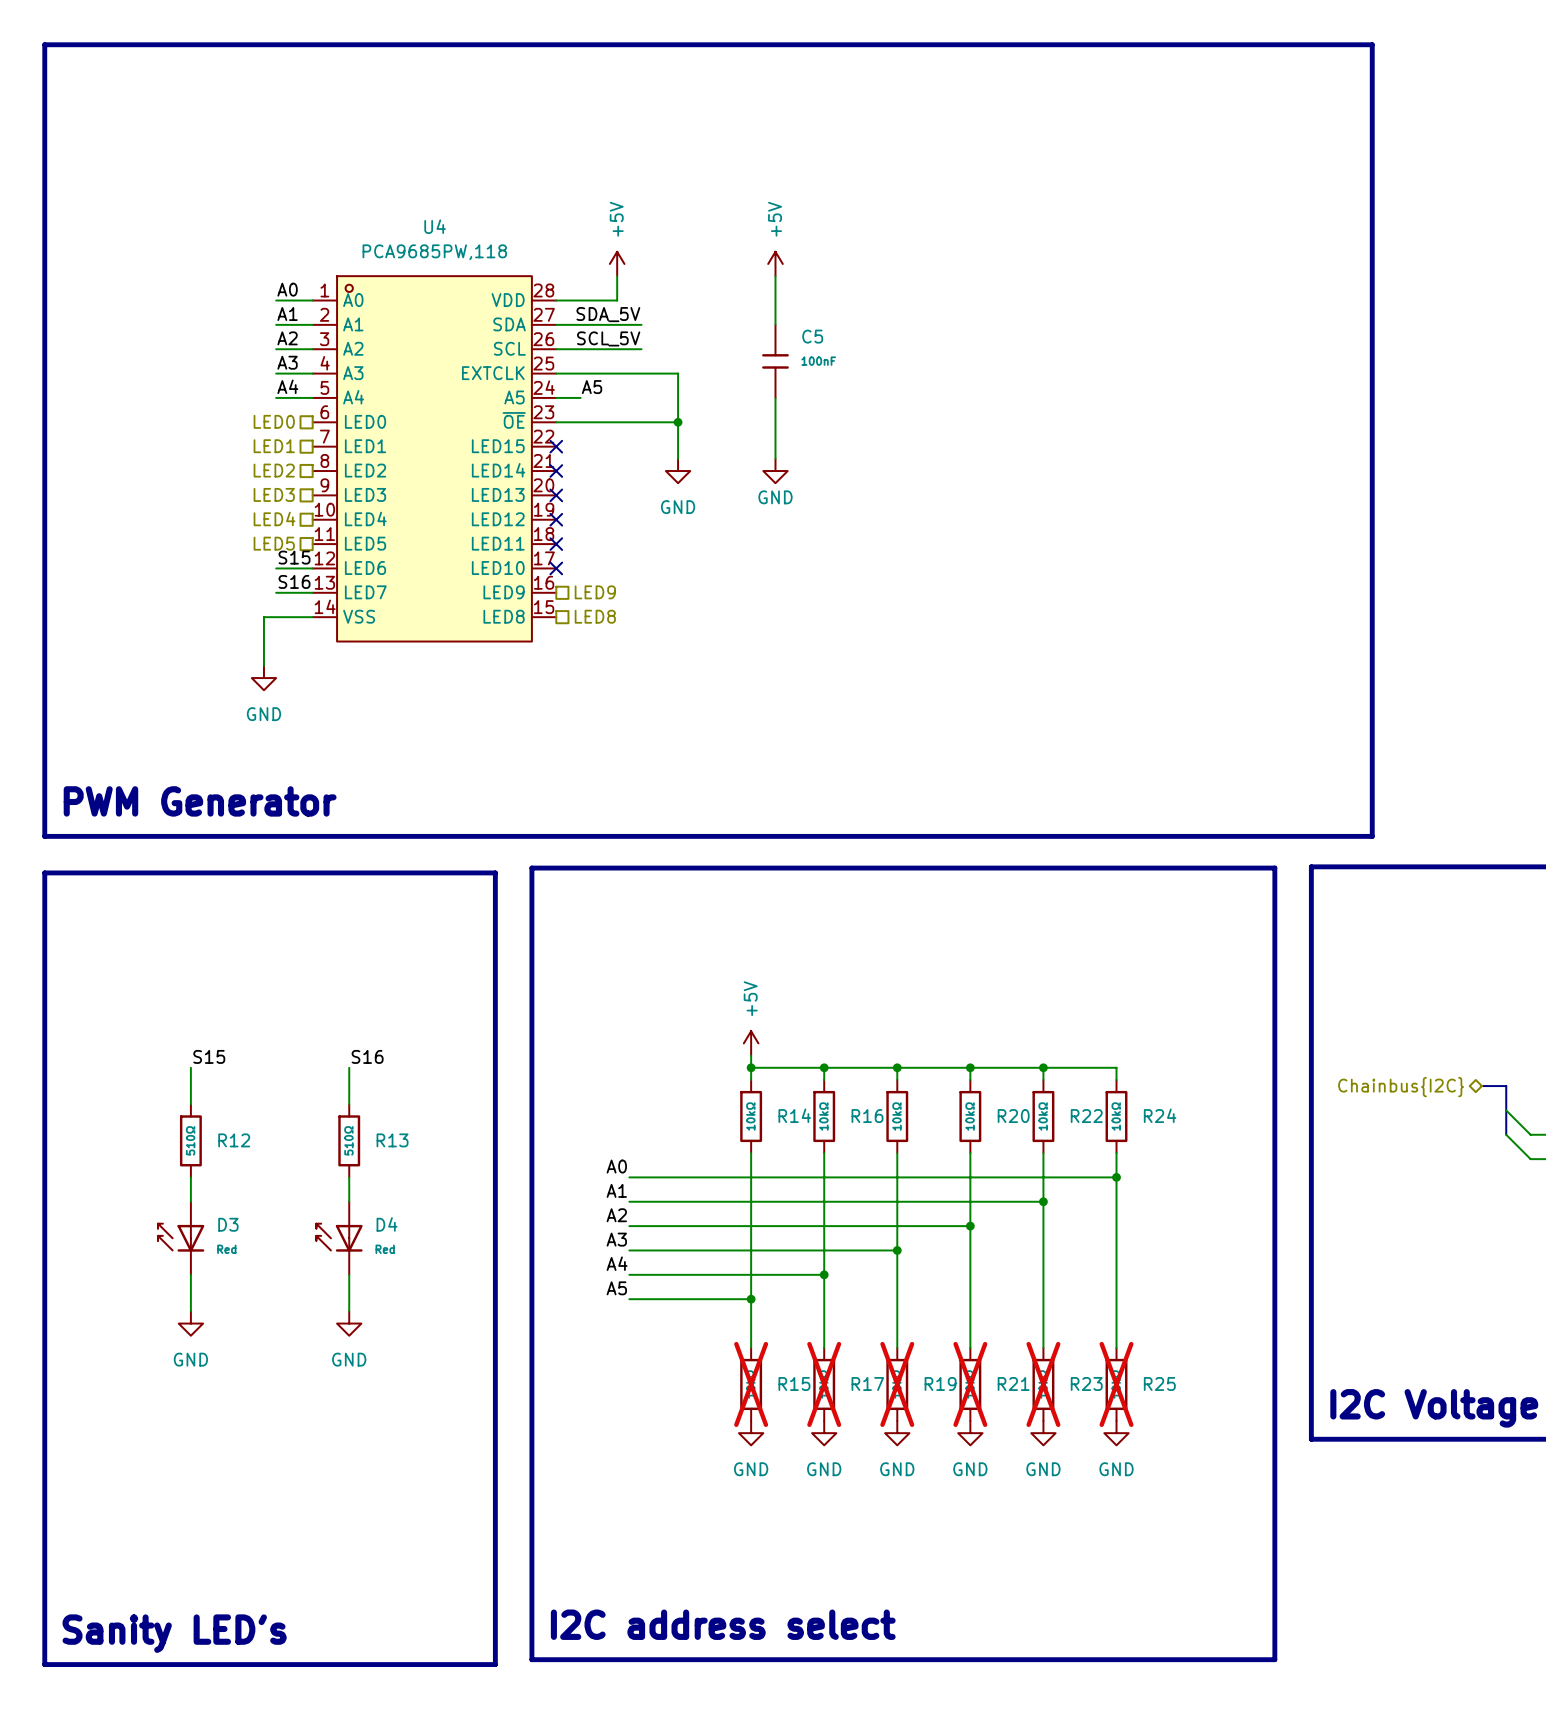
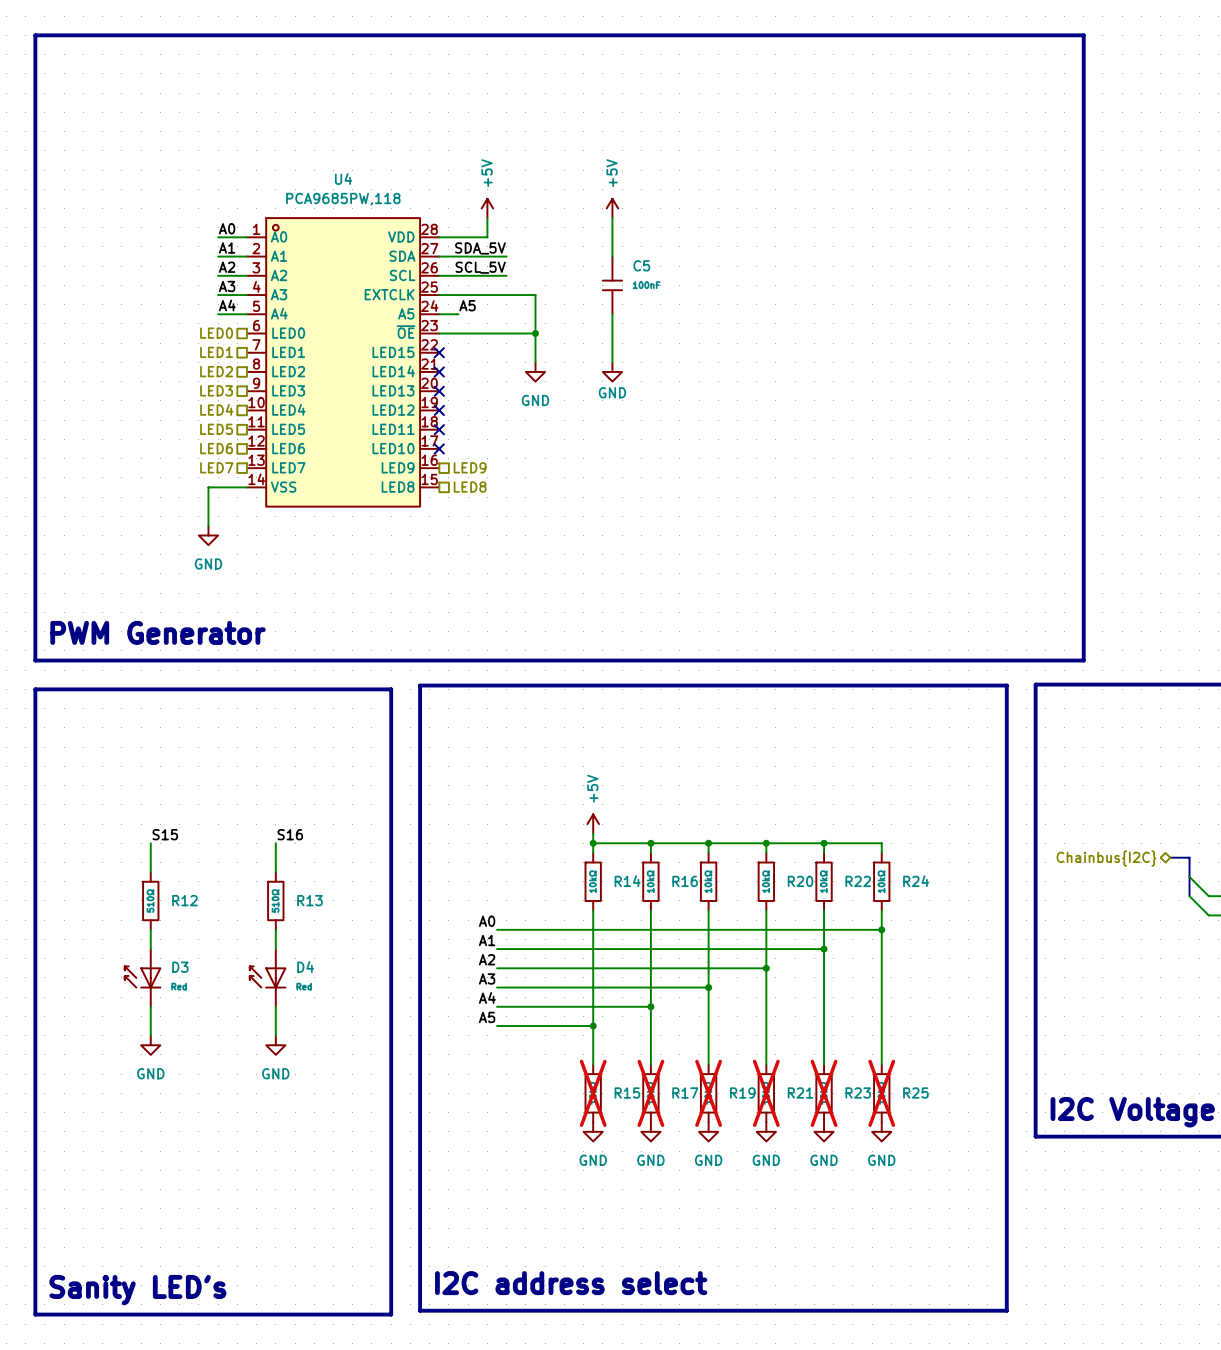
label: S15 (294, 557) -> none
hierarchical label: none -> LED6 (216, 448)
wire: (276, 568) (312, 568) -> none
label: S16 (294, 581) -> none
hierarchical label: none -> LED7 (216, 467)
wire: (276, 592) (312, 592) -> none

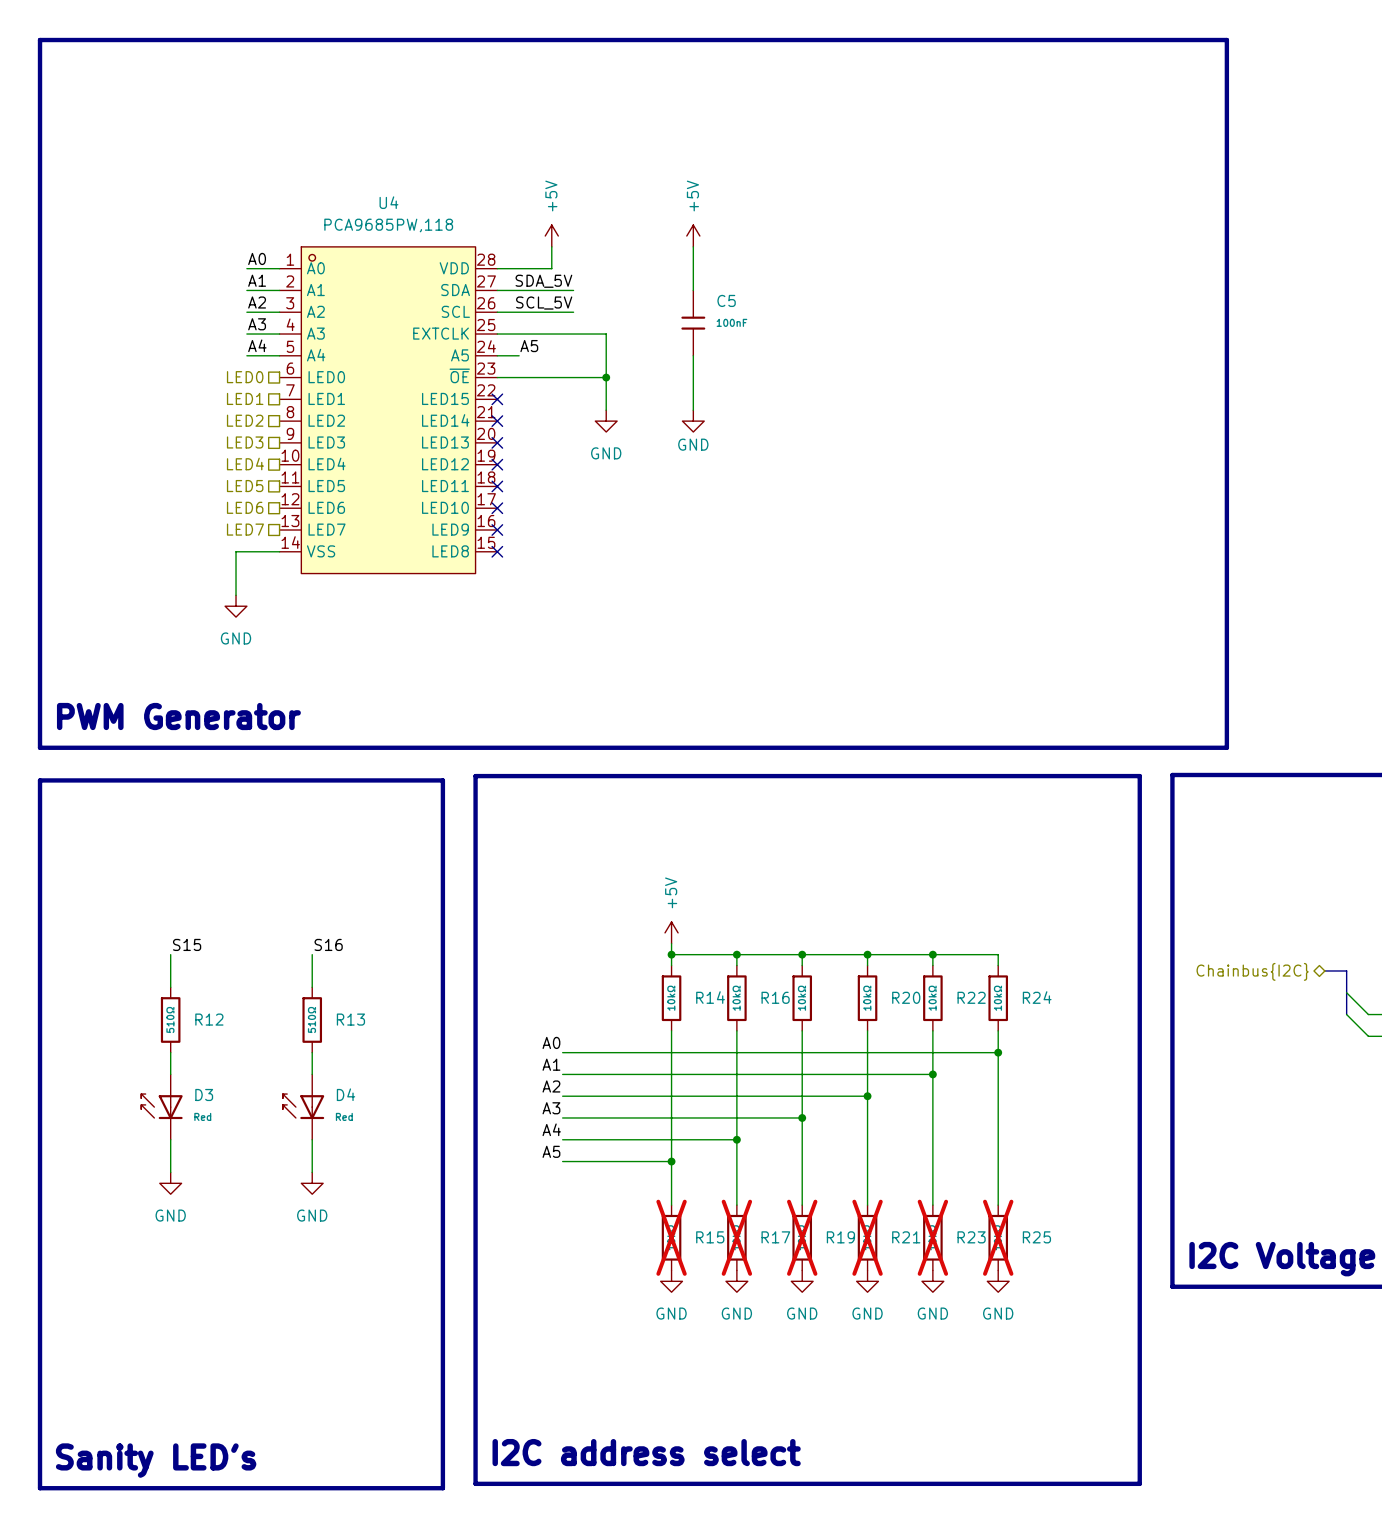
hierarchical label: LED9 (470, 467) -> none
no-connect mark: none -> (497, 530)
no-connect mark: none -> (497, 551)
hierarchical label: LED8 (470, 487) -> none

